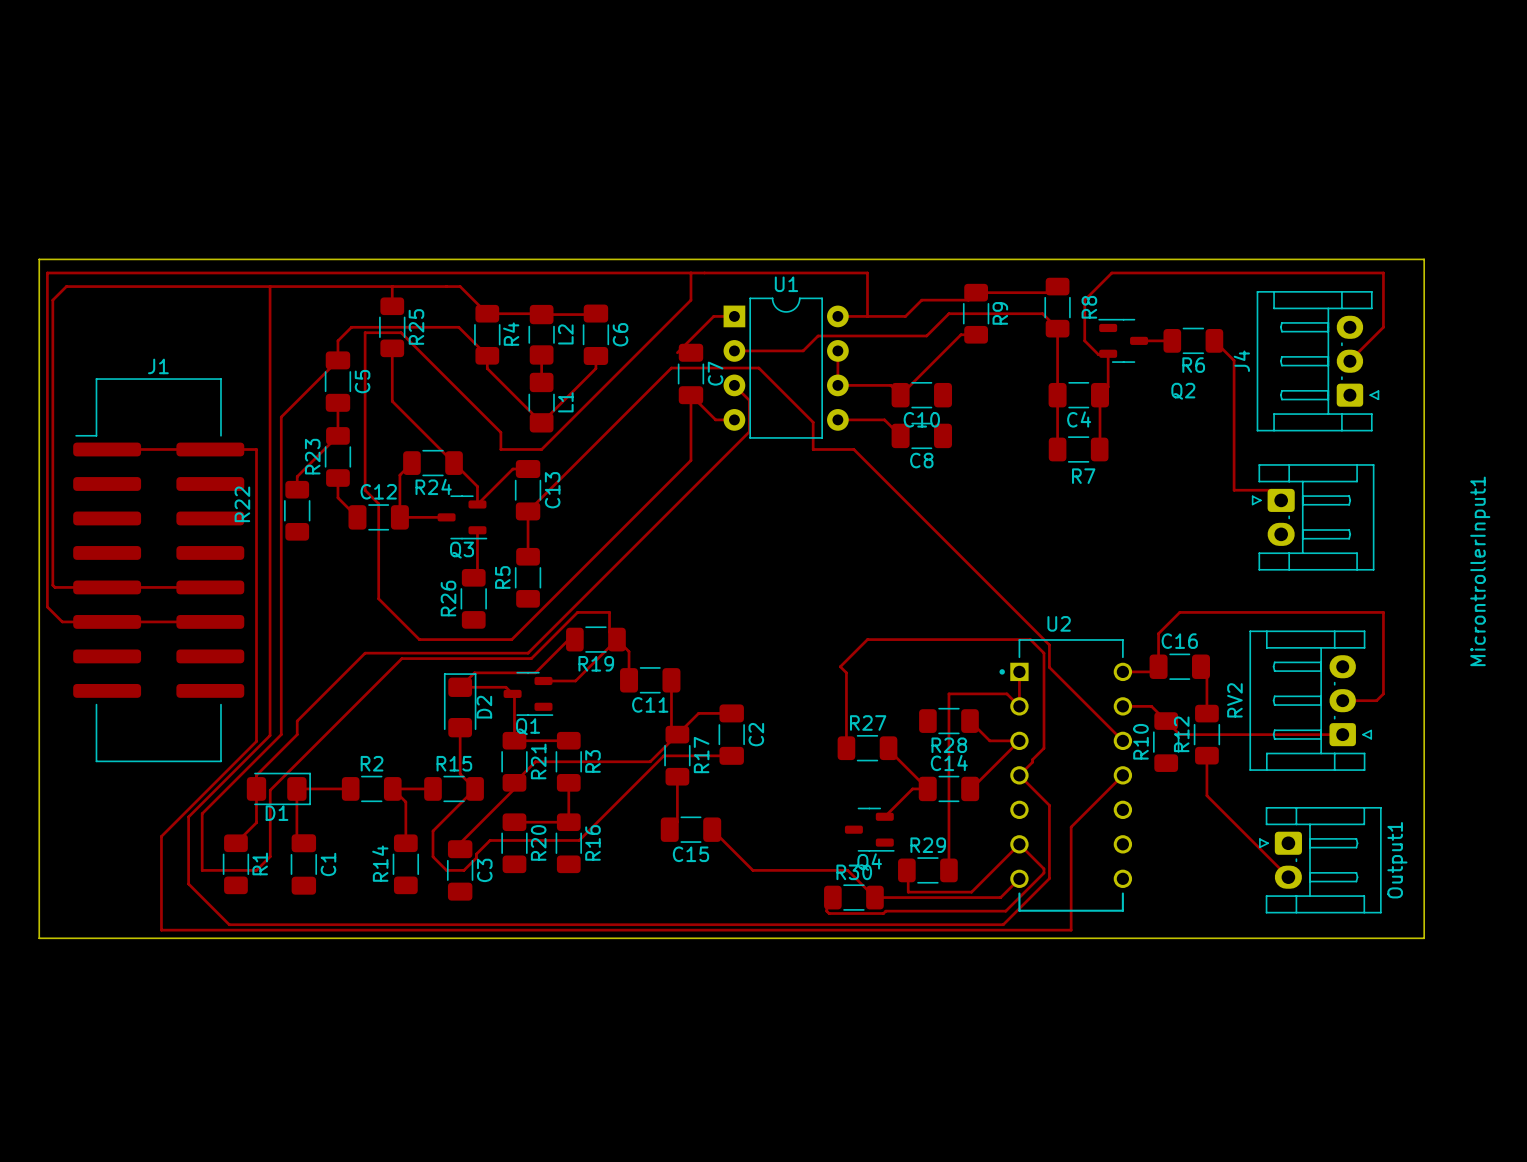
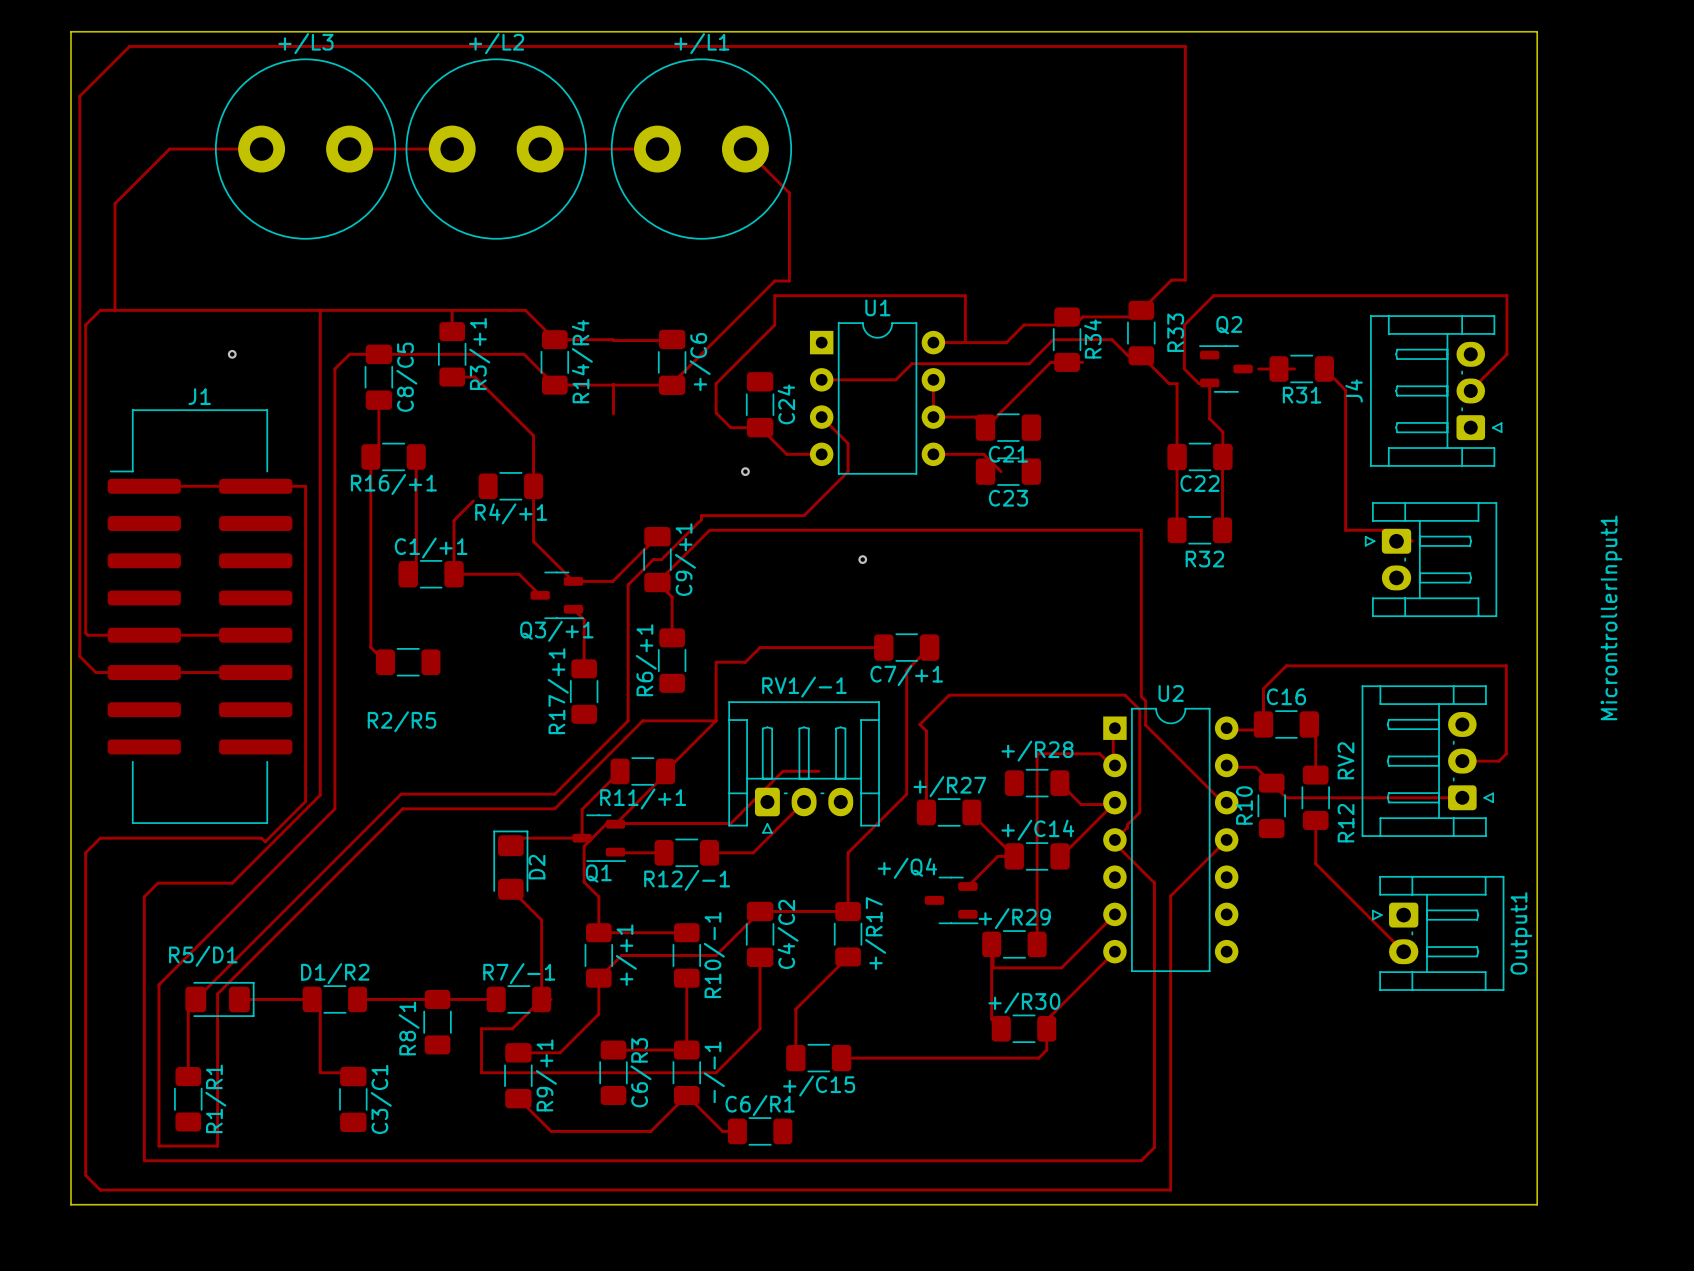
top track: none -> (261, 149) (169, 149) (114, 203) (114, 310)
+/L3: none -> (305, 149)
top track: none -> (349, 149) (452, 149)
+/L2: none -> (496, 149)
top track: none -> (540, 149) (657, 149)
+/L1: none -> (701, 149)
top track: none -> (745, 149) (789, 193) (789, 281) (774, 281) (672, 385)
board edge: (39, 259) (1424, 259) (1424, 938) (39, 938) -> (70, 281) (70, 31) (1537, 31) (1537, 1204) (70, 1204) (70, 1014)
top track: (47, 272) (690, 272) -> (79, 295) (79, 96) (129, 46) (1185, 46) (1185, 280) (1171, 280) (1134, 316)
top track: (1111, 272) (1084, 300) (1084, 340) (1098, 354) (1108, 354) -> (1229, 295) (1213, 295) (1184, 325) (1184, 368) (1199, 383) (1209, 383)
top track: (1369, 272) (1383, 272) (1383, 327) (1349, 361) -> (1506, 295) (1506, 354) (1470, 390)
top track: (1057, 286) (1051, 292) (1024, 292) -> none
R33: none -> (1141, 333)
R8: (1057, 307) -> none
R34: none -> (1067, 339)
R9: (976, 313) -> none
top track: (1003, 313) (1042, 313) (1057, 328) (1057, 449) -> (1111, 339) (1128, 355) (1141, 355) (1169, 383) (1177, 383) (1177, 530)
top track: (734, 316) (713, 316) (677, 352) -> none
R25 name: R25 (416, 326) -> R3/+1 (479, 353)
via: none -> (232, 354)
top track: (351, 327) (337, 340) (337, 360) (281, 417) (281, 734) (202, 813) (202, 870) (256, 870) (270, 856) (270, 790) (401, 658) (531, 658) (577, 612) (609, 612) (609, 632) (629, 651) (629, 680) -> (408, 354) (349, 354) (334, 368) (334, 808)
R4 name: R4 (511, 334) -> R14/R4 (582, 361)
L2: (541, 334) -> none
C6 name: C6 (620, 334) -> +/C6 (700, 362)
top track: (961, 334) (900, 395) (890, 385) -> (1066, 362) (1050, 362) (985, 427) (974, 417)
Q2 position: (1123, 340) -> (1225, 368)
R31: none -> (1301, 368)
R6: (1193, 340) -> none
top track: (1214, 340) (1234, 360) (1234, 490) -> (1324, 368) (1345, 390) (1345, 530) (1361, 530)
C8/C5: none -> (378, 377)
top track: (392, 348) (392, 401) (477, 486) (477, 504) (512, 469) (528, 469) -> (452, 377) (474, 377) (533, 435) (533, 541) (573, 581) (612, 581) (657, 536)
top track: none -> (1209, 382) (1209, 418) (1222, 432) (1222, 456)
top track: (1108, 353) (1108, 387) (1100, 395) (1099, 449) -> none
top track: (636, 354) (541, 449) (500, 449) (500, 432) (401, 332) (365, 332) (365, 490) (378, 503) (378, 598) (419, 639) (511, 639) (690, 460) (690, 395) (715, 419) -> (716, 383) (716, 412) (730, 427) (760, 427) (786, 454) (801, 454)
top track: (487, 355) (487, 368) (541, 422) (595, 368) (595, 355) -> (554, 385) (671, 385)
J4 position: (1317, 361) -> (1436, 390)
top track: none -> (378, 400) (378, 448) (370, 456) (370, 647) (385, 662)
C7 position: (690, 373) -> (760, 404)
C7 name: C7 (715, 373) -> C24 (786, 404)
C5: (337, 381) -> none
Q2 name position: Q2 (1183, 391) -> Q2 (1229, 325)
C21: none -> (1008, 427)
C10: (921, 395) -> none
C4: (1078, 395) -> none
top track: (749, 400) (749, 431) (528, 653) (365, 653) (297, 721) (297, 734) (283, 748) -> (837, 433) (848, 443) (848, 471) (804, 515) (701, 515) (701, 519) (661, 559) (653, 559) (628, 584) (628, 720) (554, 794) (401, 794) (188, 1006) (188, 1076)
top track: (337, 402) (337, 435) (297, 476) (297, 489) -> none
L1: (541, 402) -> none
top track: none -> (1231, 448) (1222, 457) (1222, 530)
R16/+1: none -> (393, 456)
top track: none -> (416, 456) (416, 566) (408, 574)
C22: none -> (1199, 456)
via: none -> (745, 471)
C23: none -> (1008, 471)
C8: (921, 435) -> none
R4/+1: none -> (510, 486)
R7: (1078, 449) -> none
R23: (337, 456) -> none
R24: (433, 463) -> none
top track: (399, 475) (399, 517) (446, 517) -> (460, 513) (454, 520) (454, 574) (519, 574) (540, 595)
top track: (337, 478) (337, 497) (357, 517) -> none
C13: (528, 490) -> none
R32: none -> (1199, 530)
R22: (297, 510) -> none
C12: (378, 517) -> none
Q3: (462, 517) -> none
C9/+1: none -> (657, 559)
via: none -> (862, 559)
MicrontrollerInput1 position: (1313, 517) -> (1431, 559)
C1/+1: none -> (431, 574)
top track: (477, 530) (477, 574) (473, 577) -> none
Q3/+1: none -> (557, 595)
top track: (528, 556) (528, 511) (671, 368) (758, 368) (813, 422) (813, 449) (853, 449) (1049, 645) (1049, 667) (1122, 740) -> none
top track: none -> (573, 609) (584, 619) (584, 668)
R5: (528, 577) -> none
top track: none -> (672, 637) (672, 597) (657, 582) (709, 530) (1141, 530) (1141, 696) (1145, 701) (1145, 725) (1224, 804)
R26: (473, 598) -> none
top track: none -> (883, 647) (760, 647) (745, 662) (716, 662) (716, 720)
C7/+1: none -> (906, 647)
top track: none -> (929, 647) (906, 670) (906, 794) (848, 852) (848, 911) (760, 911) (716, 955) (621, 955) (598, 978) (598, 1014) (560, 1052) (518, 1052) (518, 1046)
R6/+1: none -> (672, 660)
R2/R5: none -> (408, 662)
R17/+1: none -> (584, 691)
top track: (574, 639) (568, 639) (535, 672) (474, 672) (460, 687) (505, 687) (514, 695) (514, 740) (568, 740) -> none
R19: (595, 639) -> none
top track: (616, 639) (575, 680) (543, 680) -> none
U2 footprint: [999, 639, 1133, 912] -> [1103, 707, 1239, 973]
top track: none -> (716, 720) (615, 824)
C16 position: (1179, 666) -> (1286, 724)
top track: (1200, 666) (1206, 672) (1206, 713) -> (1309, 724) (1315, 730) (1315, 775)
top track: (1019, 671) (1019, 706) (1006, 693) (948, 693) (948, 870) -> (1113, 730) (1113, 767) (1099, 753) (1037, 753) (1037, 944)
top track: (1122, 671) (1153, 671) (1158, 666) (1158, 633) (1179, 612) (1383, 612) (1383, 693) (1376, 700) (1342, 700) -> (1224, 730) (1257, 730) (1263, 724) (1263, 688) (1286, 665) (1506, 665) (1506, 753) (1498, 761) (1462, 761)
C11: (650, 680) -> none
top track: (671, 680) (671, 728) (677, 734) -> none
Q1 position: (528, 693) -> (599, 838)
RV2 position: (1310, 700) -> (1427, 761)
D2 position: (460, 705) -> (510, 865)
top track: (1122, 706) (1151, 706) (1179, 734) (1342, 734) -> (1224, 767) (1255, 767) (1286, 797) (1462, 797)
RV1/-1: none -> (804, 767)
top track: none -> (620, 771) (582, 809) (582, 838) (518, 838) (510, 845)
R11/+1: none -> (642, 771)
R28: (948, 721) -> none
top track: (970, 721) (989, 740) (1019, 740) (970, 788) -> (1059, 783) (1081, 804) (1113, 804) (1060, 856)
+/R28: none -> (1037, 783)
top track: (460, 727) (460, 774) (475, 788) (433, 831) (433, 856) (446, 870) (463, 870) (490, 840) (579, 840) (663, 755) (731, 755) -> none
C2: (731, 734) -> none
R12 name position: R12 (1181, 734) -> R12 (1346, 823)
R12 position: (1206, 734) -> (1315, 797)
top track: none -> (804, 802) (753, 852) (709, 852)
R10 position: (1166, 742) -> (1271, 805)
top track: (846, 748) (846, 672) (840, 666) (867, 639) (1030, 639) (1044, 653) (1044, 748) (1019, 775) (1049, 805) (1049, 878) (1003, 924) (483, 924) -> none
R27: (867, 748) -> none
top track: (888, 748) (927, 788) (912, 788) (884, 816) -> (971, 812) (1014, 856) (997, 856) (967, 886)
top track: none -> (926, 812) (926, 731) (919, 724) (949, 695) (1125, 695) (1139, 709) (1139, 812) (1113, 841) (1154, 882) (1154, 1147) (1141, 1160) (144, 1160) (144, 896) (157, 883) (232, 883)
+/R27: none -> (949, 812)
R17: (677, 755) -> none
top track: (1206, 755) (1206, 795) (1288, 877) -> (1315, 820) (1315, 863) (1403, 951)
R21: (514, 761) -> none
R3: (568, 761) -> none
top track: (256, 775) (256, 822) (235, 843) -> (305, 838) (158, 984) (158, 1146) (217, 1146) (217, 993) (402, 808) (554, 808) (642, 720) (716, 720)
top track: (1122, 775) (1071, 827) (1071, 930) (161, 930) (161, 836) (219, 778) -> (1224, 841) (1170, 896) (1170, 1190) (100, 1190) (85, 1175) (85, 852) (100, 838) (261, 838) (265, 841)
top track: (677, 776) (677, 822) (669, 829) -> none
top track: (568, 782) (568, 822) (514, 822) -> none
D1: (278, 788) -> none
top track: (350, 788) (296, 788) (296, 836) (303, 843) -> none
R2: (371, 788) -> none
top track: (433, 788) (392, 788) (405, 802) (405, 843) -> none
R15: (454, 788) -> none
top track: (514, 788) (460, 843) (460, 849) -> (584, 852) (584, 882) (598, 896) (598, 932) (686, 932)
top track: none -> (615, 852) (664, 852)
R12/-1: none -> (686, 852)
C14: (948, 788) -> none
+/C14: none -> (1037, 856)
top track: (188, 816) (188, 883) (229, 924) -> (239, 999) (276, 999)
top track: none -> (510, 889) (541, 920) (541, 999) (512, 1028) (481, 1028) (481, 1072) (716, 1072) (760, 1028) (760, 957)
C15: (690, 829) -> none
top track: (712, 829) (752, 870) (847, 870) (874, 897) (1000, 897) (1019, 878) -> none
Q4: (869, 829) -> none
+/Q4: none -> (951, 900)
R20: (514, 843) -> none
R16: (568, 843) -> none
top track: none -> (1113, 916) (1061, 967) (993, 967) (991, 944) (991, 1019) (1001, 1028)
Output1 position: (1320, 860) -> (1438, 933)
R1: (235, 864) -> none
C1: (303, 864) -> none
R14: (405, 864) -> none
C4/C2: none -> (760, 934)
+/R17: none -> (848, 934)
C3: (460, 870) -> none
top track: (906, 870) (908, 892) (971, 892) (1019, 844) (1044, 868) (1044, 872) (1005, 911) (885, 911) (883, 913) (829, 913) (826, 911) (826, 903) (832, 897) -> none
R29: (927, 870) -> none
+/R29: none -> (1014, 944)
top track: none -> (1113, 953) (1046, 1019) (1046, 1050) (1038, 1058) (841, 1058)
+/+1: none -> (598, 955)
R10/-1: none -> (686, 955)
top track: none -> (848, 956) (795, 1009) (795, 1058)
R30: (853, 897) -> none
top track: none -> (686, 978) (686, 1050) (613, 1050)
R5/D1: none -> (219, 999)
top track: (262, 924) (304, 924) -> (312, 999) (320, 1007) (320, 1072) (349, 1072)
D1/R2: none -> (334, 999)
top track: (433, 924) (475, 924) -> none
R7/-1: none -> (518, 999)
R8/1: none -> (437, 1022)
+/R30: none -> (1024, 1028)
+/C15: none -> (818, 1058)
C6/R3: none -> (613, 1072)
-/-1: none -> (686, 1072)
R9/+1: none -> (518, 1075)
top track: none -> (518, 1098) (551, 1131) (650, 1131) (686, 1095) (722, 1131) (737, 1131)
R1/R1: none -> (188, 1099)
C3/C1: none -> (353, 1099)
C6/R1: none -> (760, 1131)

